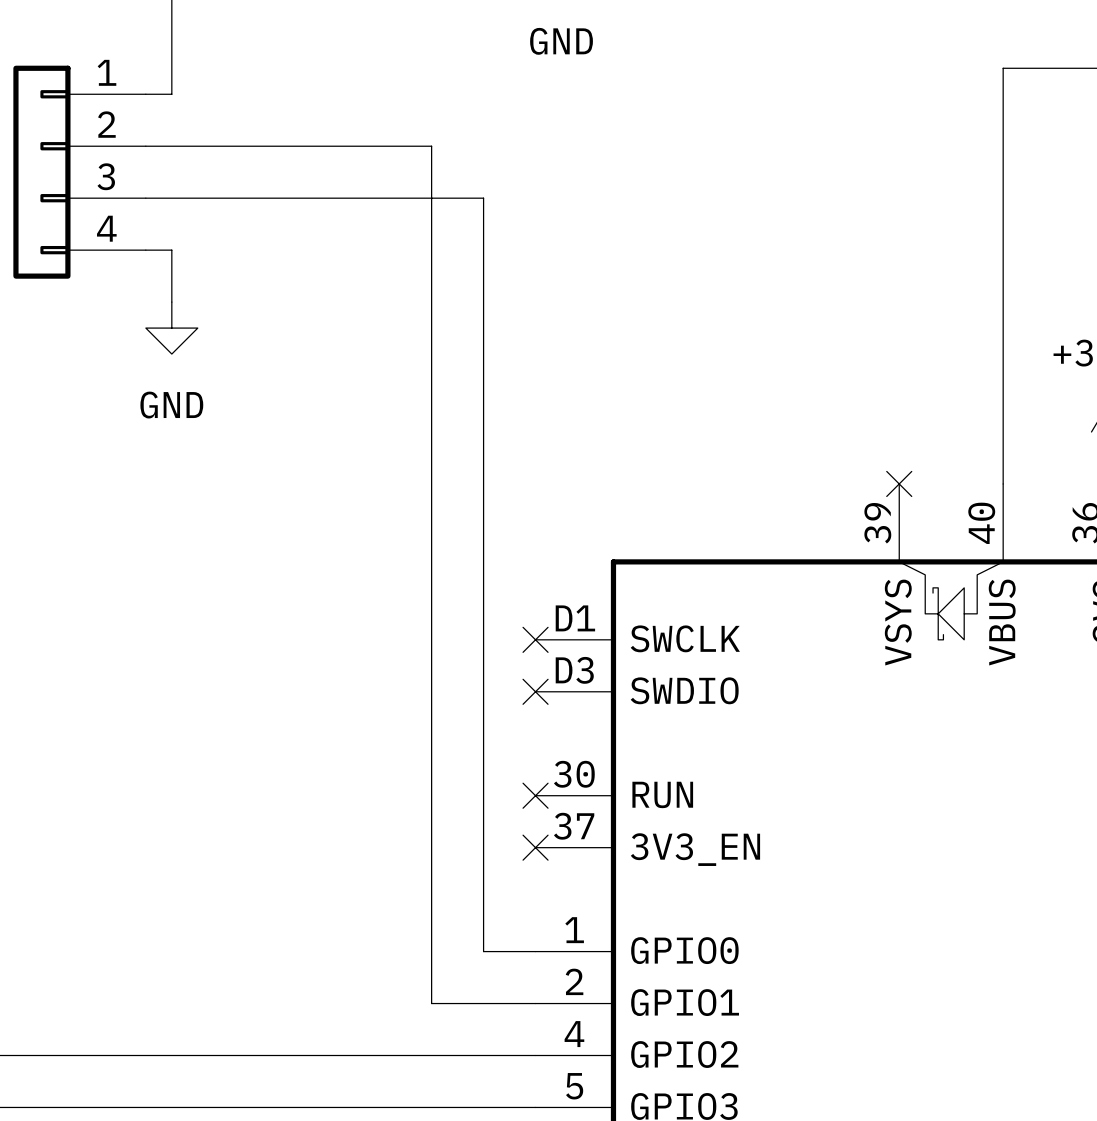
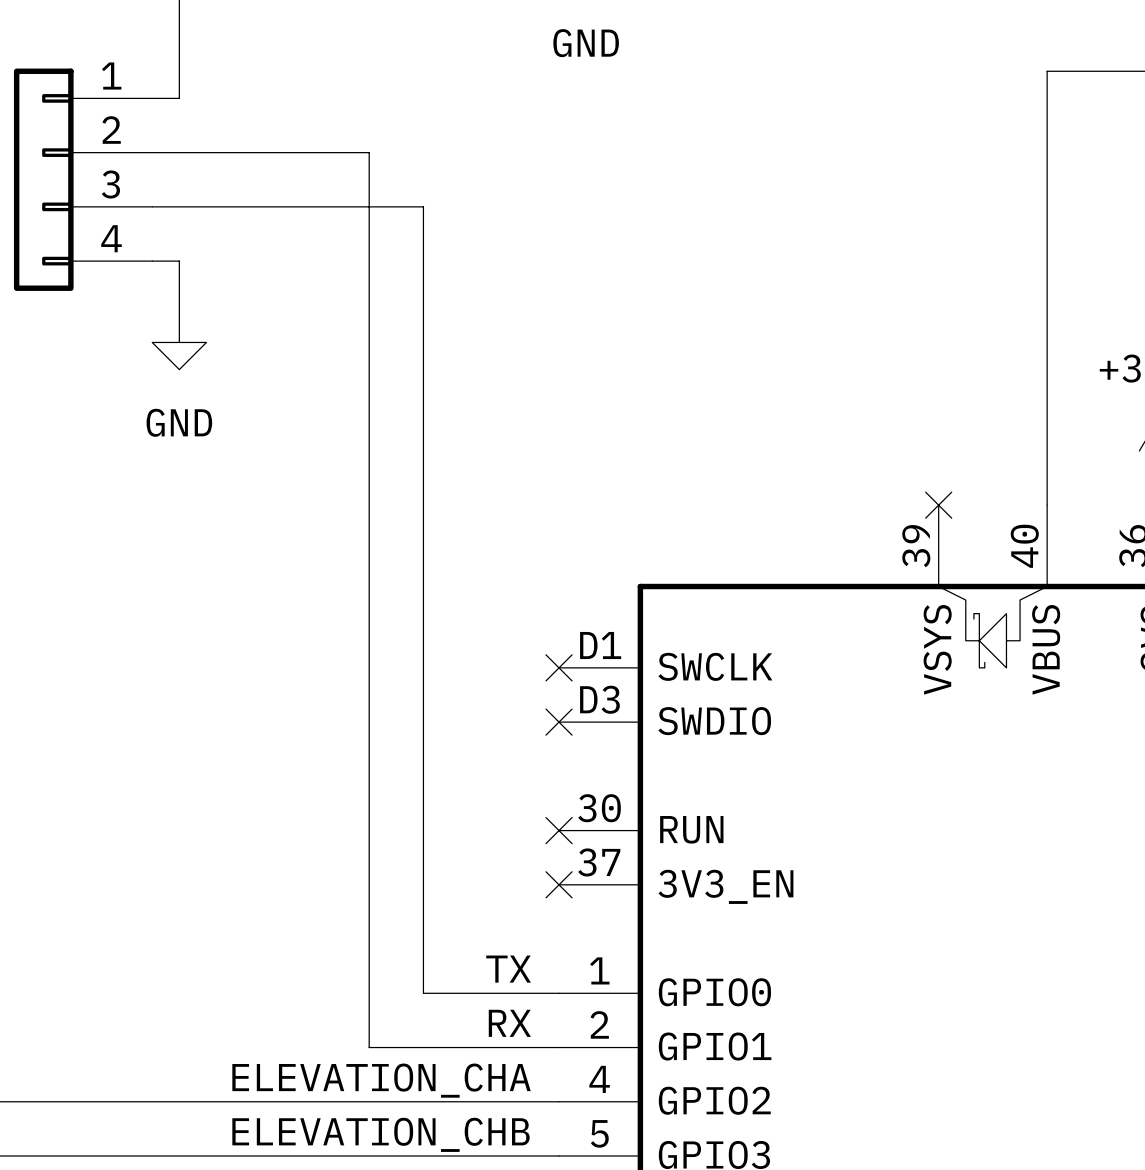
wire: (353, 146) (431, 146) (431, 1003) -> (369, 152) (369, 1047) (450, 1047)
wire: (405, 198) (483, 198) (483, 951) -> (423, 206) (423, 993) (504, 993)
label: none -> TX (508, 969)
label: none -> RX (509, 1023)
label: none -> ELEVATION_CHA (381, 1080)
label: none -> ELEVATION_CHB (381, 1134)

